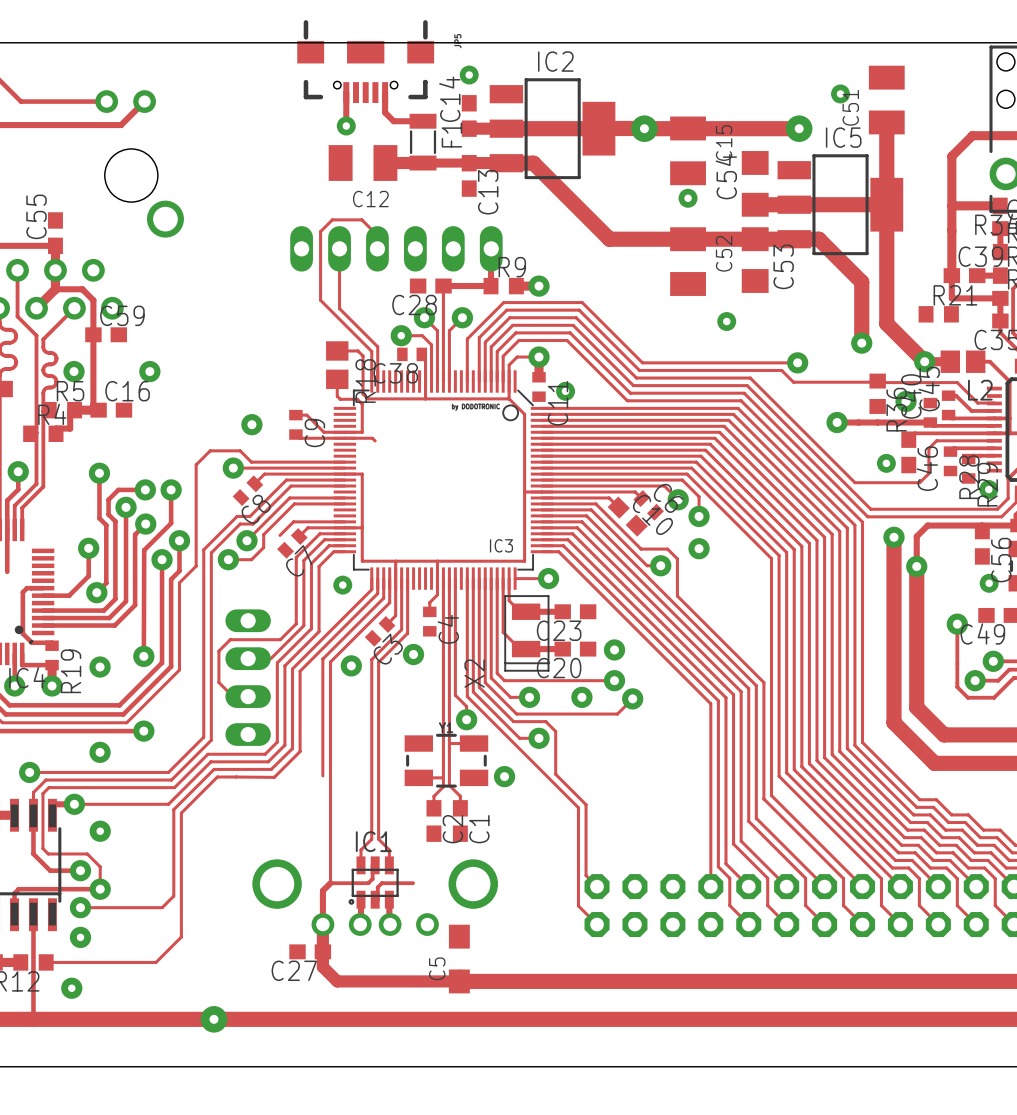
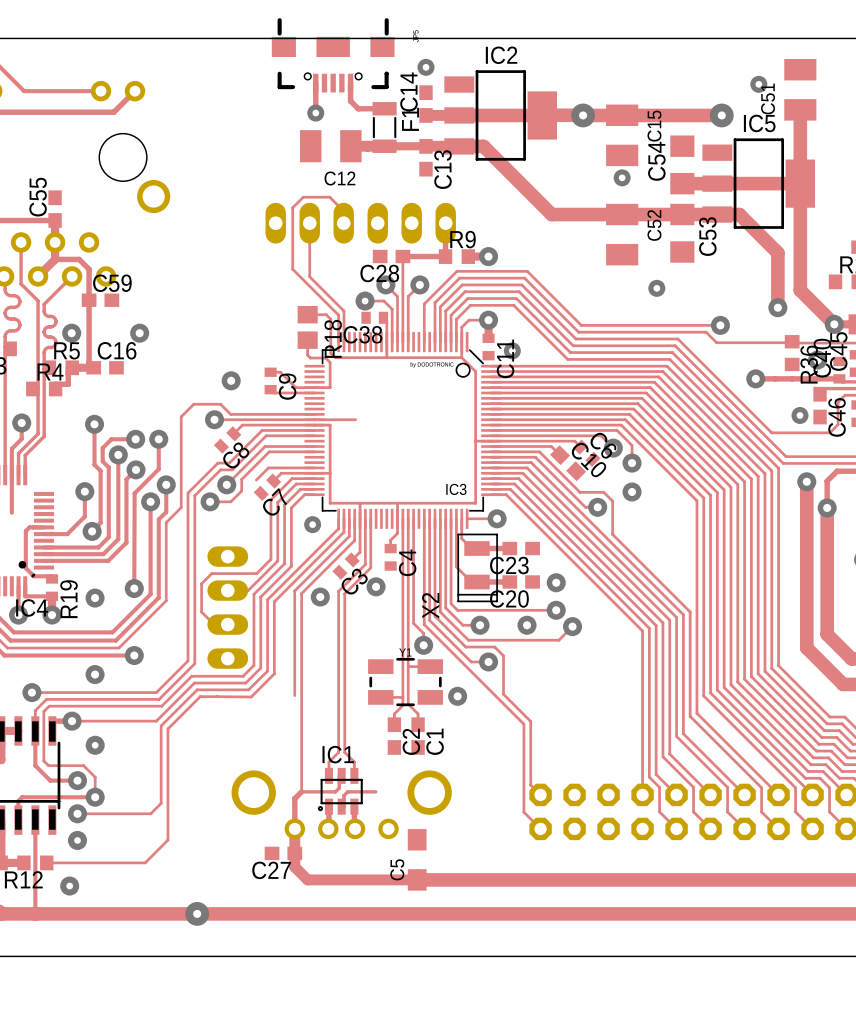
track: (344, 438) (372, 438) (375, 440) -> none
track: none -> (314, 419) (355, 419)

